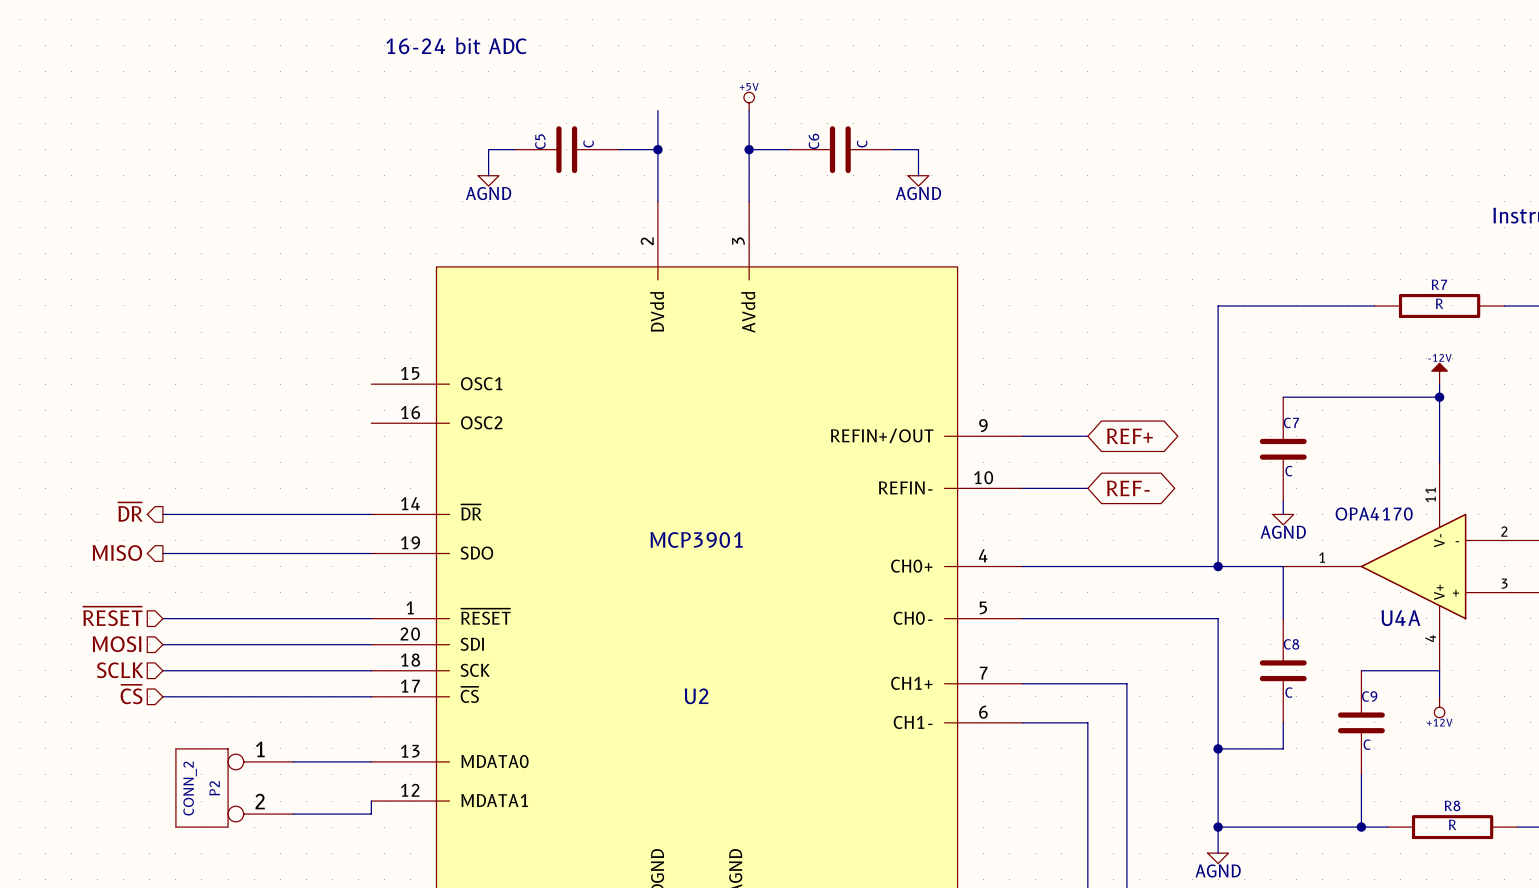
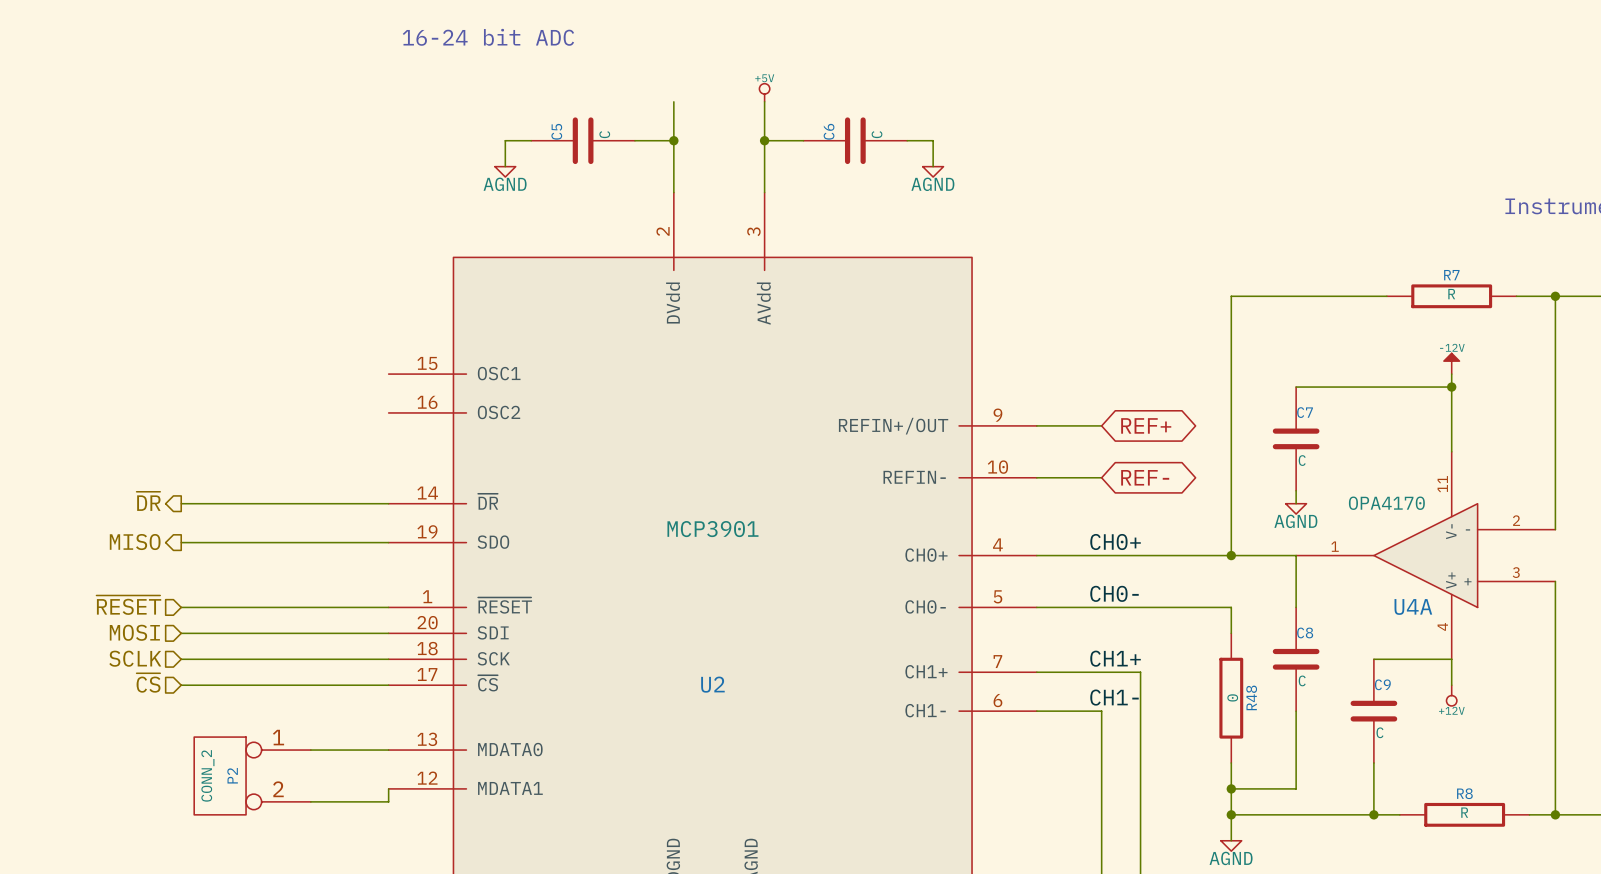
label: none -> CH0+ (1115, 542)
label: none -> CH0- (1114, 593)
wire: (1218, 644) (1218, 774) -> none
label: none -> CH1+ (1115, 658)
label: none -> CH1- (1114, 697)
R48: none -> 0 (1231, 698)
wire: (1218, 748) (1283, 748) -> (1231, 788) (1296, 788) (1296, 737)
junction position: (1218, 748) -> (1231, 788)

